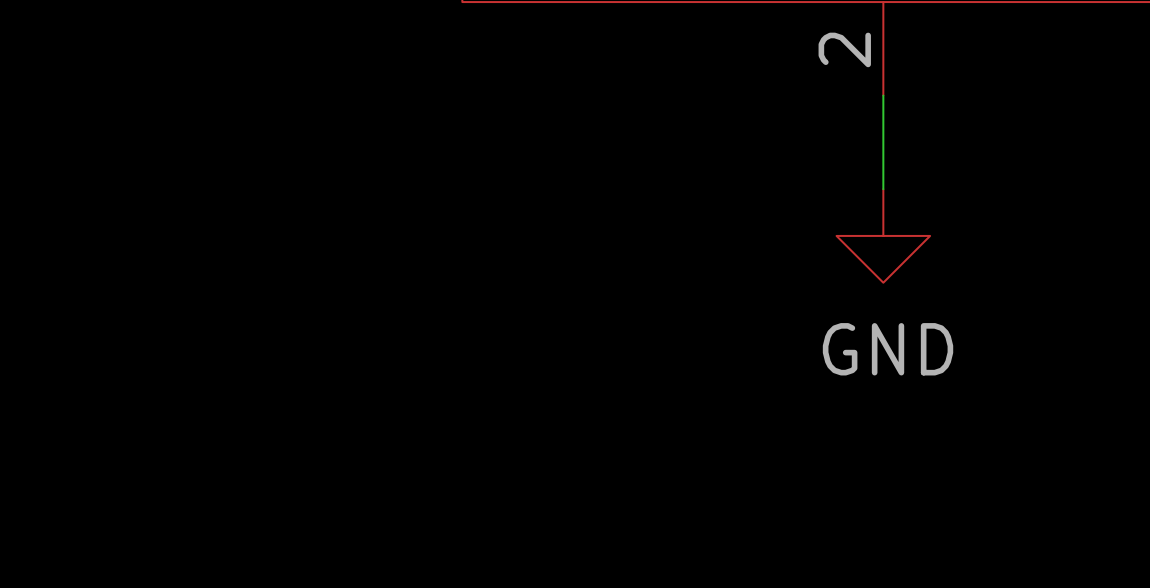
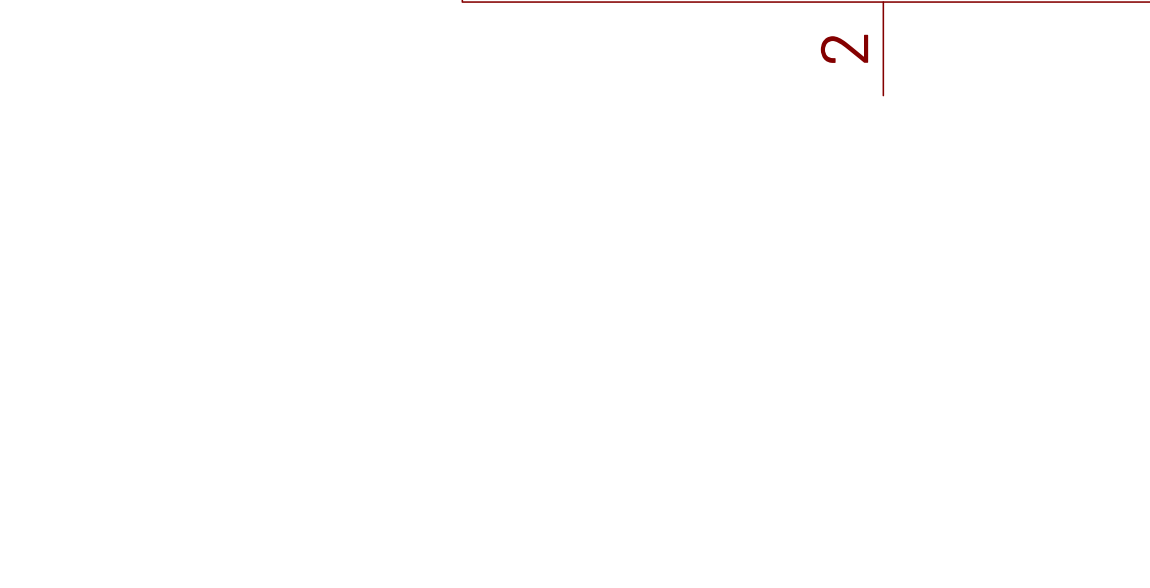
wire: (883, 95) (883, 189) -> none
power symbol: GND (883, 235) -> none

